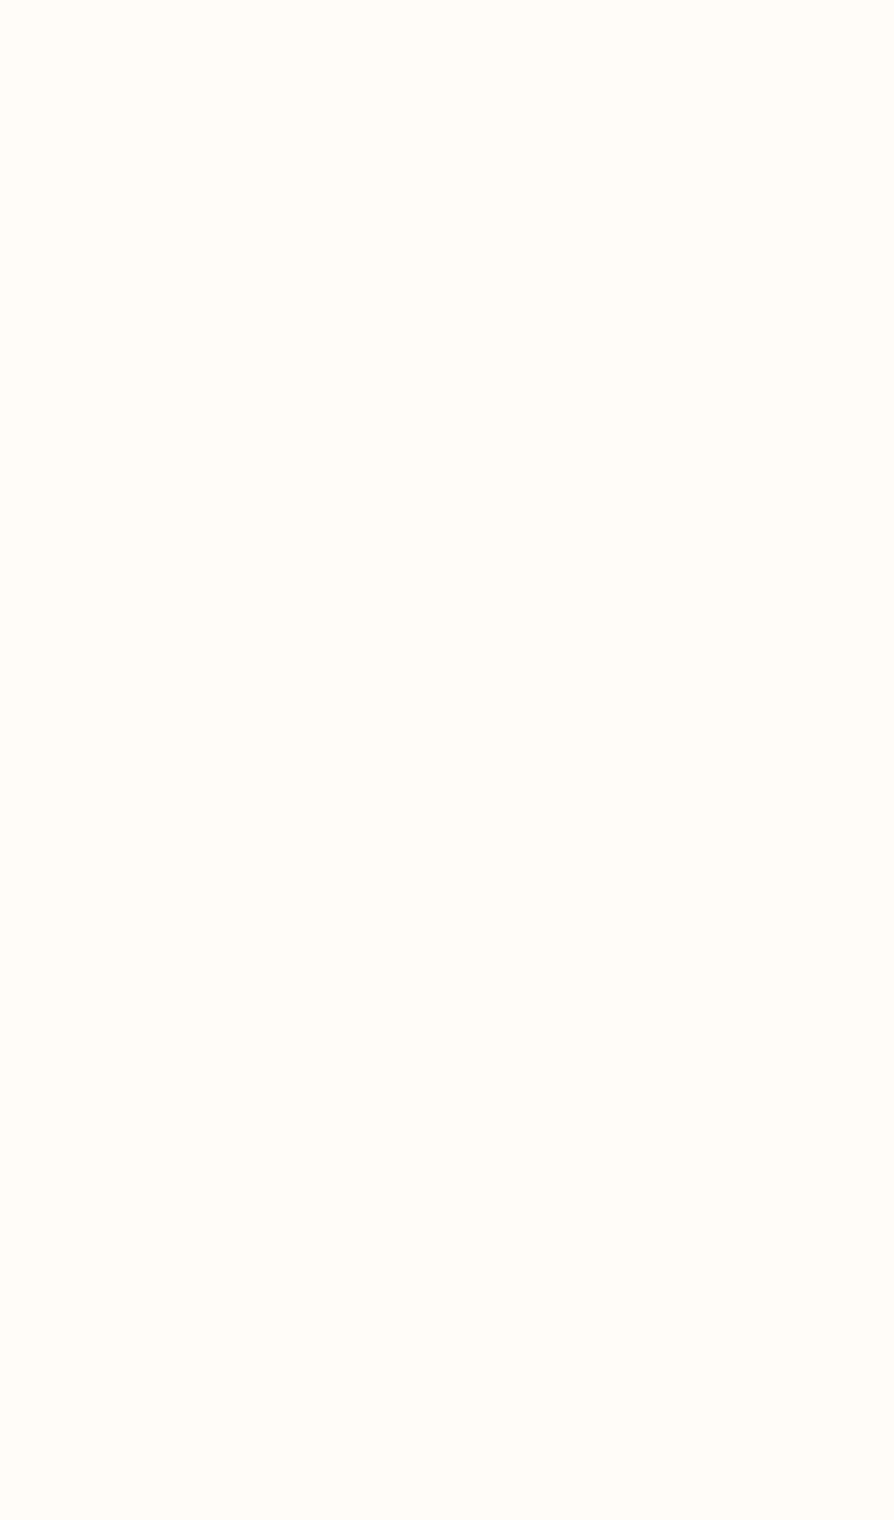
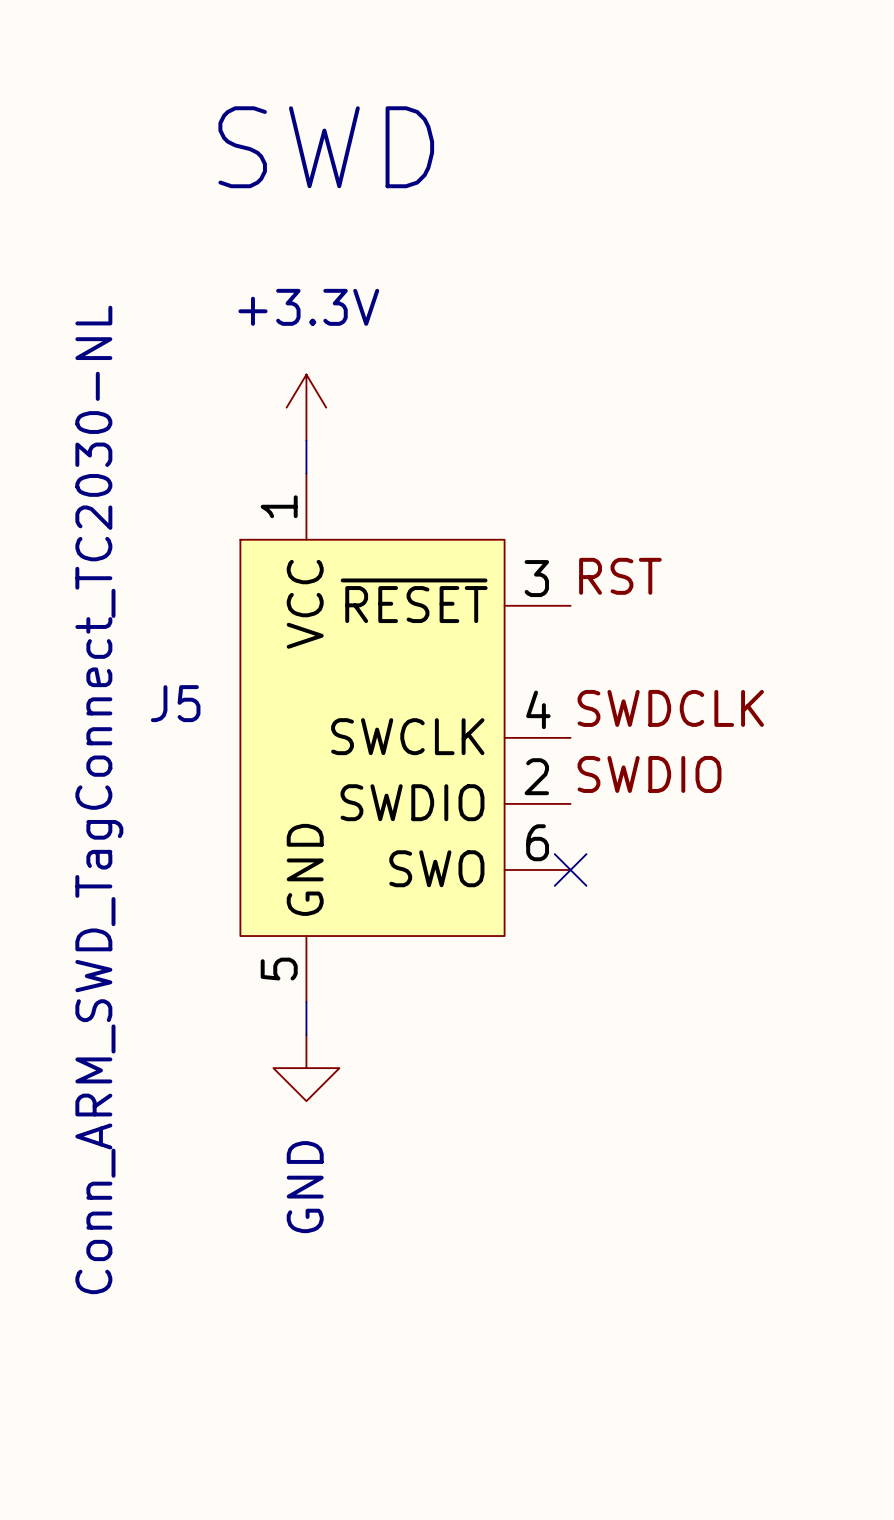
text: none -> SWD (326, 147)
power symbol: none -> +3.3V (306, 407)
wire: none -> (306, 440) (306, 473)
label: none -> RST (620, 576)
label: none -> SWDCLK (670, 708)
J5: none -> Conn_ARM_SWD_TagConnect_TC2030-NL (405, 737)
label: none -> SWDIO (649, 774)
no-connect mark: none -> (570, 869)
wire: none -> (306, 1002) (306, 1035)
power symbol: none -> GND (306, 1068)

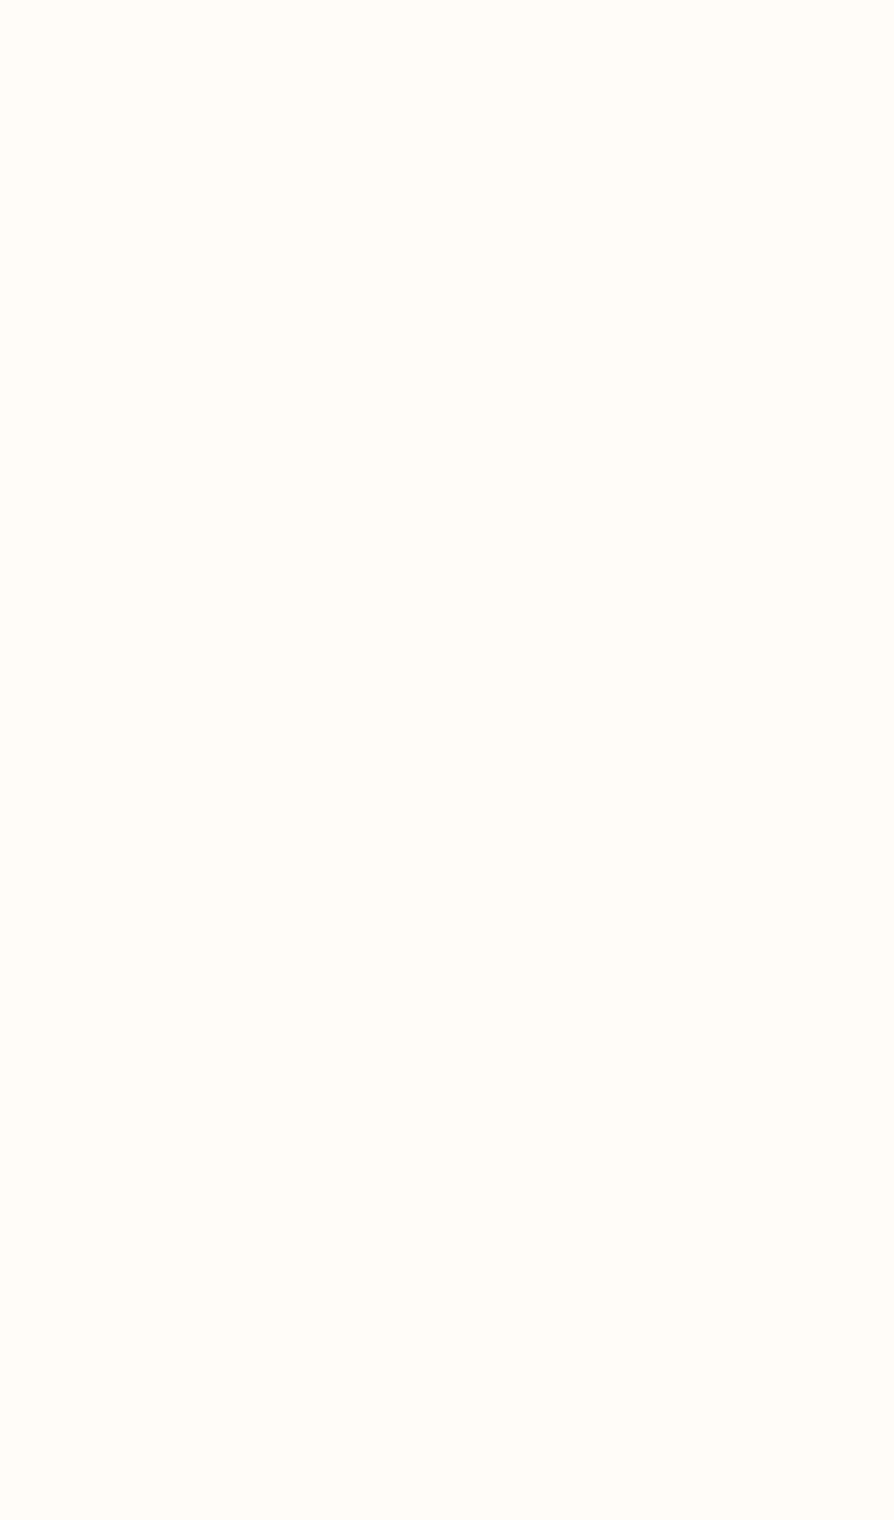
text: SWD (326, 147) -> none
power symbol: +3.3V (306, 407) -> none
wire: (306, 440) (306, 473) -> none
label: RST (620, 576) -> none
label: SWDCLK (670, 708) -> none
J5: Conn_ARM_SWD_TagConnect_TC2030-NL (405, 737) -> none
label: SWDIO (649, 774) -> none
no-connect mark: (570, 869) -> none
wire: (306, 1002) (306, 1035) -> none
power symbol: GND (306, 1068) -> none

